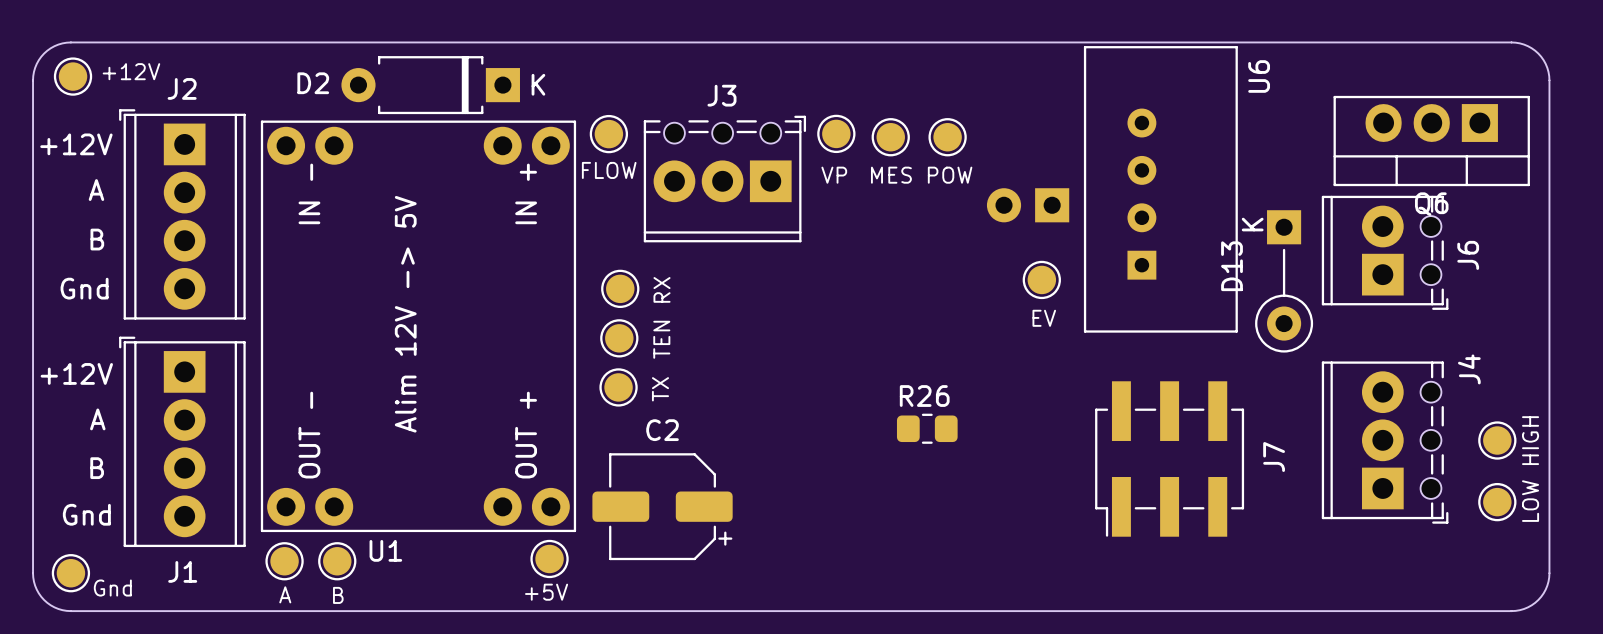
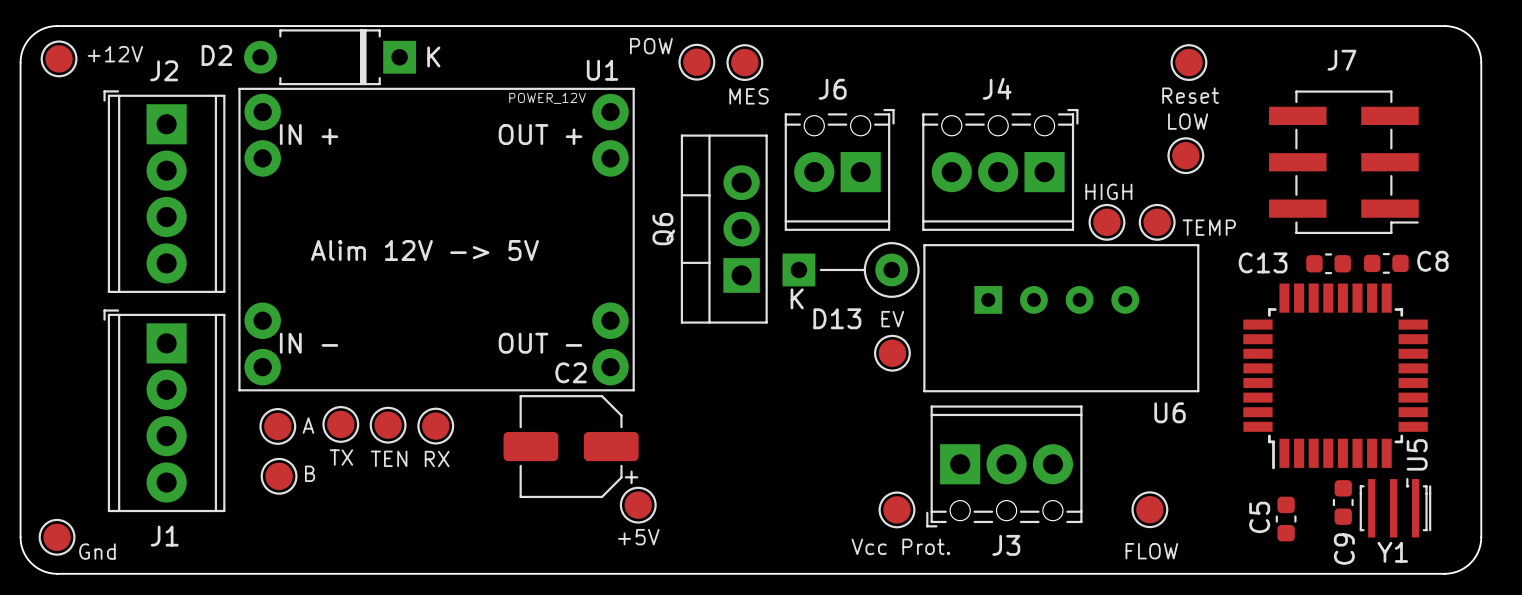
part: none -> (696, 62)
part: none -> (744, 62)
part: none -> (1188, 62)
D2 position: (430, 85) -> (330, 57)
text: none -> Reset (1190, 95)
text: none -> POWER_12V (547, 98)
part: (836, 133) -> none
part: (608, 134) -> none
part: (890, 137) -> none
part: (947, 137) -> none
text: none -> LOW (1188, 121)
Q6 rotation: 0° (1431, 141) -> 90° clockwise (724, 229)
Q6 position: (1431, 141) -> (724, 229)
text: +12V (76, 144) -> none
text: FLOW (609, 170) -> none
text: VP (834, 175) -> none
text position: MES (891, 175) -> MES (749, 96)
text position: POW (950, 175) -> POW (651, 46)
part: none -> (1185, 155)
J3 rotation: 0° (724, 179) -> 180° (1004, 466)
J3 position: (724, 179) -> (1004, 466)
U6 rotation: 0° (1160, 189) -> 90° clockwise (1061, 318)
text: A (96, 190) -> none
part: (1028, 205) -> none
text: B (97, 239) -> none
part: none -> (1106, 222)
part: none -> (1157, 222)
text: none -> TEMP (1209, 227)
J6 rotation: 0° (1385, 252) -> 90° counterclockwise (839, 169)
J6 position: (1385, 252) -> (839, 169)
part: (1041, 279) -> none
D13 rotation: 0° (1284, 281) -> 90° counterclockwise (851, 269)
D13 position: (1284, 281) -> (851, 269)
text: Gnd (84, 288) -> none
part: (620, 288) -> none
C8: none -> (1386, 263)
text rotation: 0° (662, 289) -> 90° clockwise (437, 459)
text position: RX (662, 289) -> RX (437, 459)
C13: none -> (1328, 263)
text position: EV (1044, 318) -> EV (892, 319)
U1 rotation: 0° (418, 326) -> 90° counterclockwise (436, 239)
part: (619, 338) -> none
text rotation: 0° (661, 339) -> 90° clockwise (389, 458)
text position: TEN (661, 339) -> TEN (389, 458)
J4 name position: J4 (1469, 369) -> J4 (997, 88)
text: +12V (76, 373) -> none
part: none -> (892, 353)
part: (618, 387) -> none
text rotation: 0° (660, 389) -> 90° clockwise (341, 457)
text position: TX (660, 389) -> TX (341, 457)
U5: none -> (1335, 376)
text: A (97, 419) -> none
R26: (927, 428) -> none
part: (1497, 440) -> none
text rotation: 0° (1530, 440) -> 90° clockwise (1108, 191)
text position: HIGH (1530, 440) -> HIGH (1108, 191)
J4 rotation: 0° (1385, 442) -> 90° counterclockwise (1000, 169)
J4 position: (1385, 442) -> (1000, 169)
part: none -> (340, 424)
part: none -> (388, 425)
text: none -> A (308, 425)
part: none -> (435, 426)
part: none -> (277, 426)
J7 rotation: 0° (1169, 458) -> 90° counterclockwise (1343, 162)
J7 position: (1169, 458) -> (1343, 162)
text: B (97, 468) -> none
text: LOW (1530, 501) -> none
part: (1497, 502) -> none
C2 position: (662, 506) -> (571, 446)
part: none -> (279, 476)
text: Gnd (86, 514) -> none
C9: none -> (1343, 502)
part: none -> (638, 505)
Y1: none -> (1395, 507)
part: none -> (896, 509)
part: none -> (1149, 509)
U1 name position: U1 (385, 550) -> U1 (602, 70)
C5: none -> (1286, 519)
part: (549, 558) -> none
part: (284, 561) -> none
part: (337, 561) -> none
text: none -> Vcc Prot. (900, 546)
text: none -> FLOW (1151, 551)
text position: +5V (546, 592) -> +5V (638, 537)
text: A (285, 594) -> none
text position: B (338, 595) -> B (310, 473)

